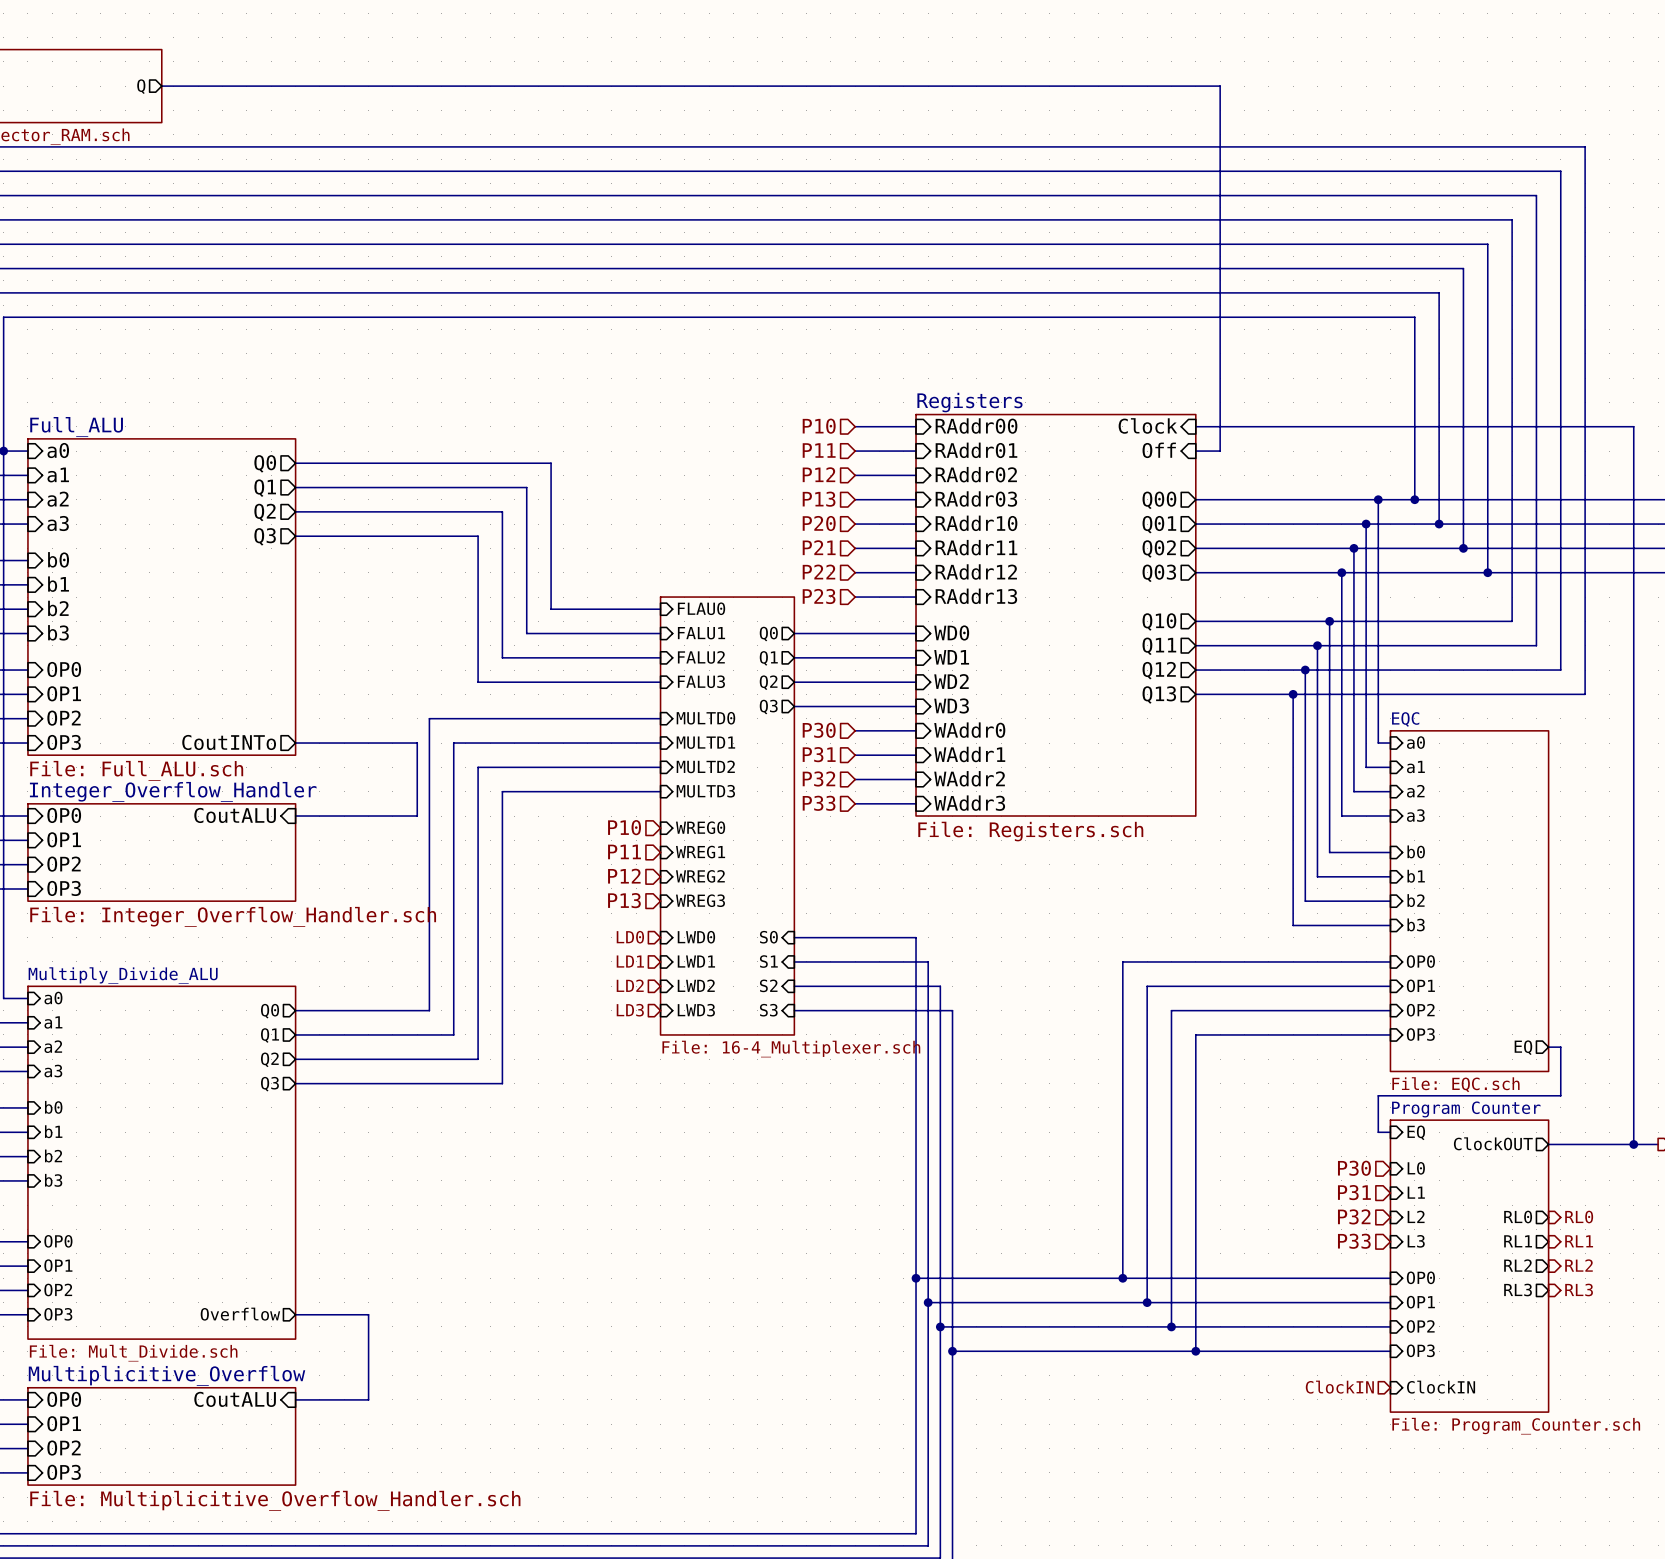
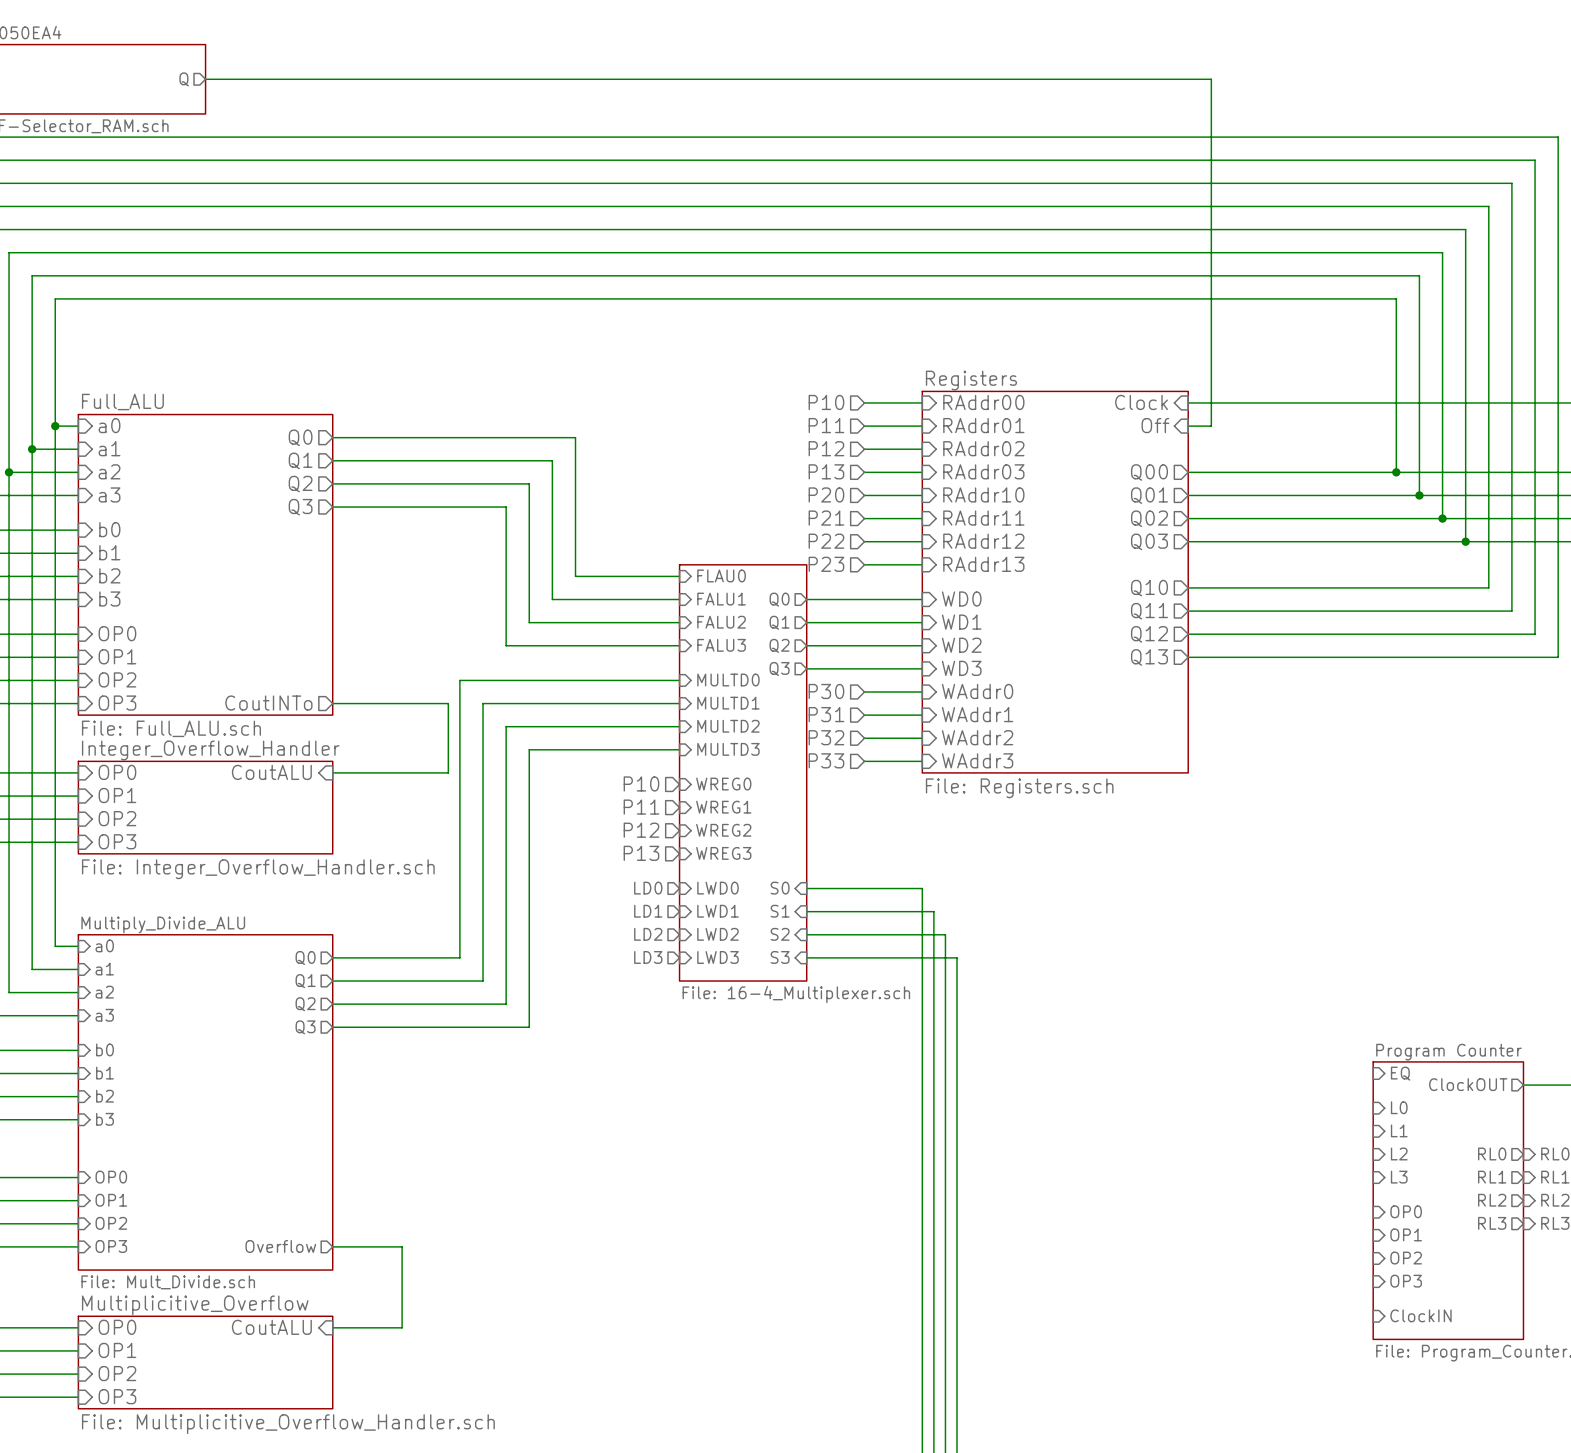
wire: (1378, 499) (1378, 743) (1390, 743) -> none
junction: (1378, 499) -> none
wire: (1366, 524) (1366, 767) (1390, 767) -> none
junction: (1366, 524) -> none
wire: (1353, 548) (1353, 791) (1390, 791) -> none
junction: (1353, 548) -> none
wire: (1341, 572) (1341, 816) (1390, 816) -> none
junction: (1341, 572) -> none
wire: (1329, 621) (1329, 852) (1390, 852) -> none
junction: (1329, 621) -> none
wire: (1317, 645) (1317, 876) (1390, 876) -> none
junction: (1317, 645) -> none
wire: (1305, 670) (1305, 901) (1390, 901) -> none
junction: (1305, 670) -> none
wire: (1293, 694) (1293, 925) (1390, 925) -> none
junction: (1293, 694) -> none
sheet pin: a0 (1415, 742) -> none
sheet pin: a1 (1415, 767) -> none
sheet pin: a2 (1415, 791) -> none
sheet pin: a3 (1415, 815) -> none
sheet pin: b0 (1416, 851) -> none
sheet pin: b1 (1416, 876) -> none
sheet pin: b2 (1416, 900) -> none
sheet EQC: File: EQC.sch (1469, 901) -> none
sheet pin: b3 (1416, 924) -> none
wire: (1390, 961) (1122, 961) (1122, 1278) -> none
sheet pin: OP0 (1420, 961) -> none
sheet pin: OP1 (1420, 985) -> none
wire: (1390, 986) (1147, 986) (1147, 1302) -> none
wire: (1390, 1010) (1171, 1010) (1171, 1326) -> none
sheet pin: OP2 (1420, 1010) -> none
wire: (1390, 1034) (1195, 1034) (1195, 1351) -> none
sheet pin: OP3 (1420, 1034) -> none
sheet pin: EQ (1523, 1047) -> none
wire: (1548, 1047) (1560, 1047) (1560, 1095) (1378, 1095) (1378, 1132) (1390, 1132) -> none
hierarchical label: P30 (1354, 1168) -> none
hierarchical label: P31 (1354, 1192) -> none
hierarchical label: P32 (1354, 1216) -> none
hierarchical label: P33 (1354, 1241) -> none
wire: (916, 1278) (1390, 1278) -> none
junction: (916, 1278) -> none
junction: (1122, 1278) -> none
wire: (928, 1302) (1390, 1302) -> none
junction: (928, 1302) -> none
junction: (1147, 1302) -> none
wire: (940, 1326) (1390, 1326) -> none
junction: (940, 1326) -> none
junction: (1171, 1326) -> none
wire: (952, 1351) (1390, 1351) -> none
junction: (952, 1351) -> none
junction: (1195, 1351) -> none
hierarchical label: ClockIN (1339, 1387) -> none

